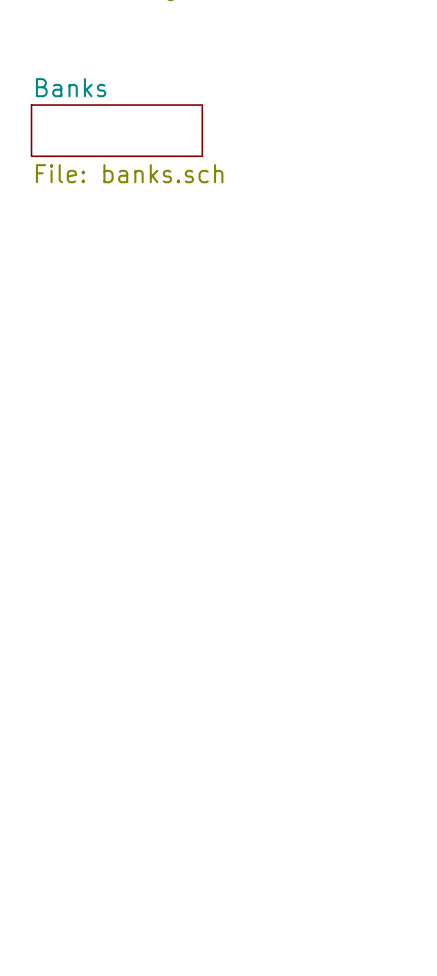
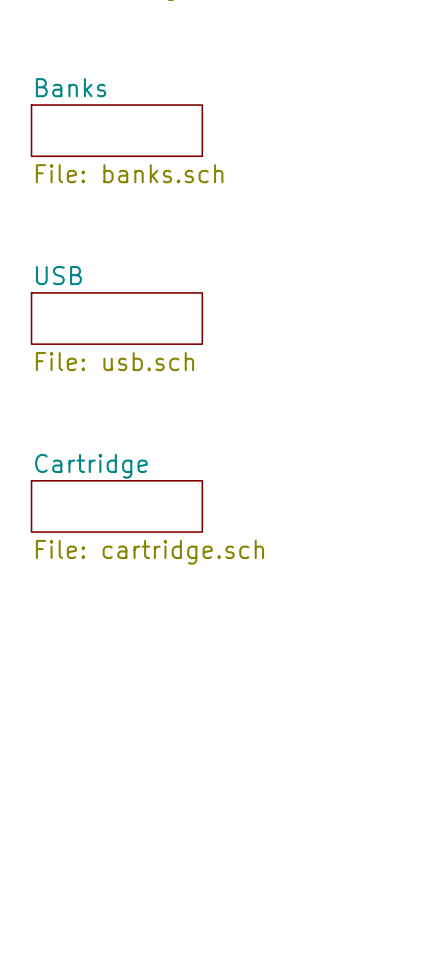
sheet USB: none -> File: usb.sch (116, 318)
sheet Cartridge: none -> File: cartridge.sch (116, 506)

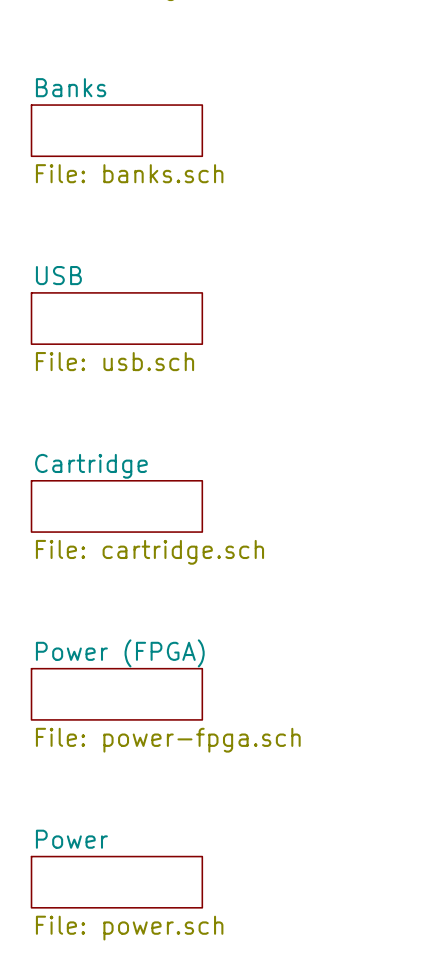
sheet Power (FPGA): none -> File: power-fpga.sch (116, 694)
sheet Power: none -> File: power.sch (116, 882)

